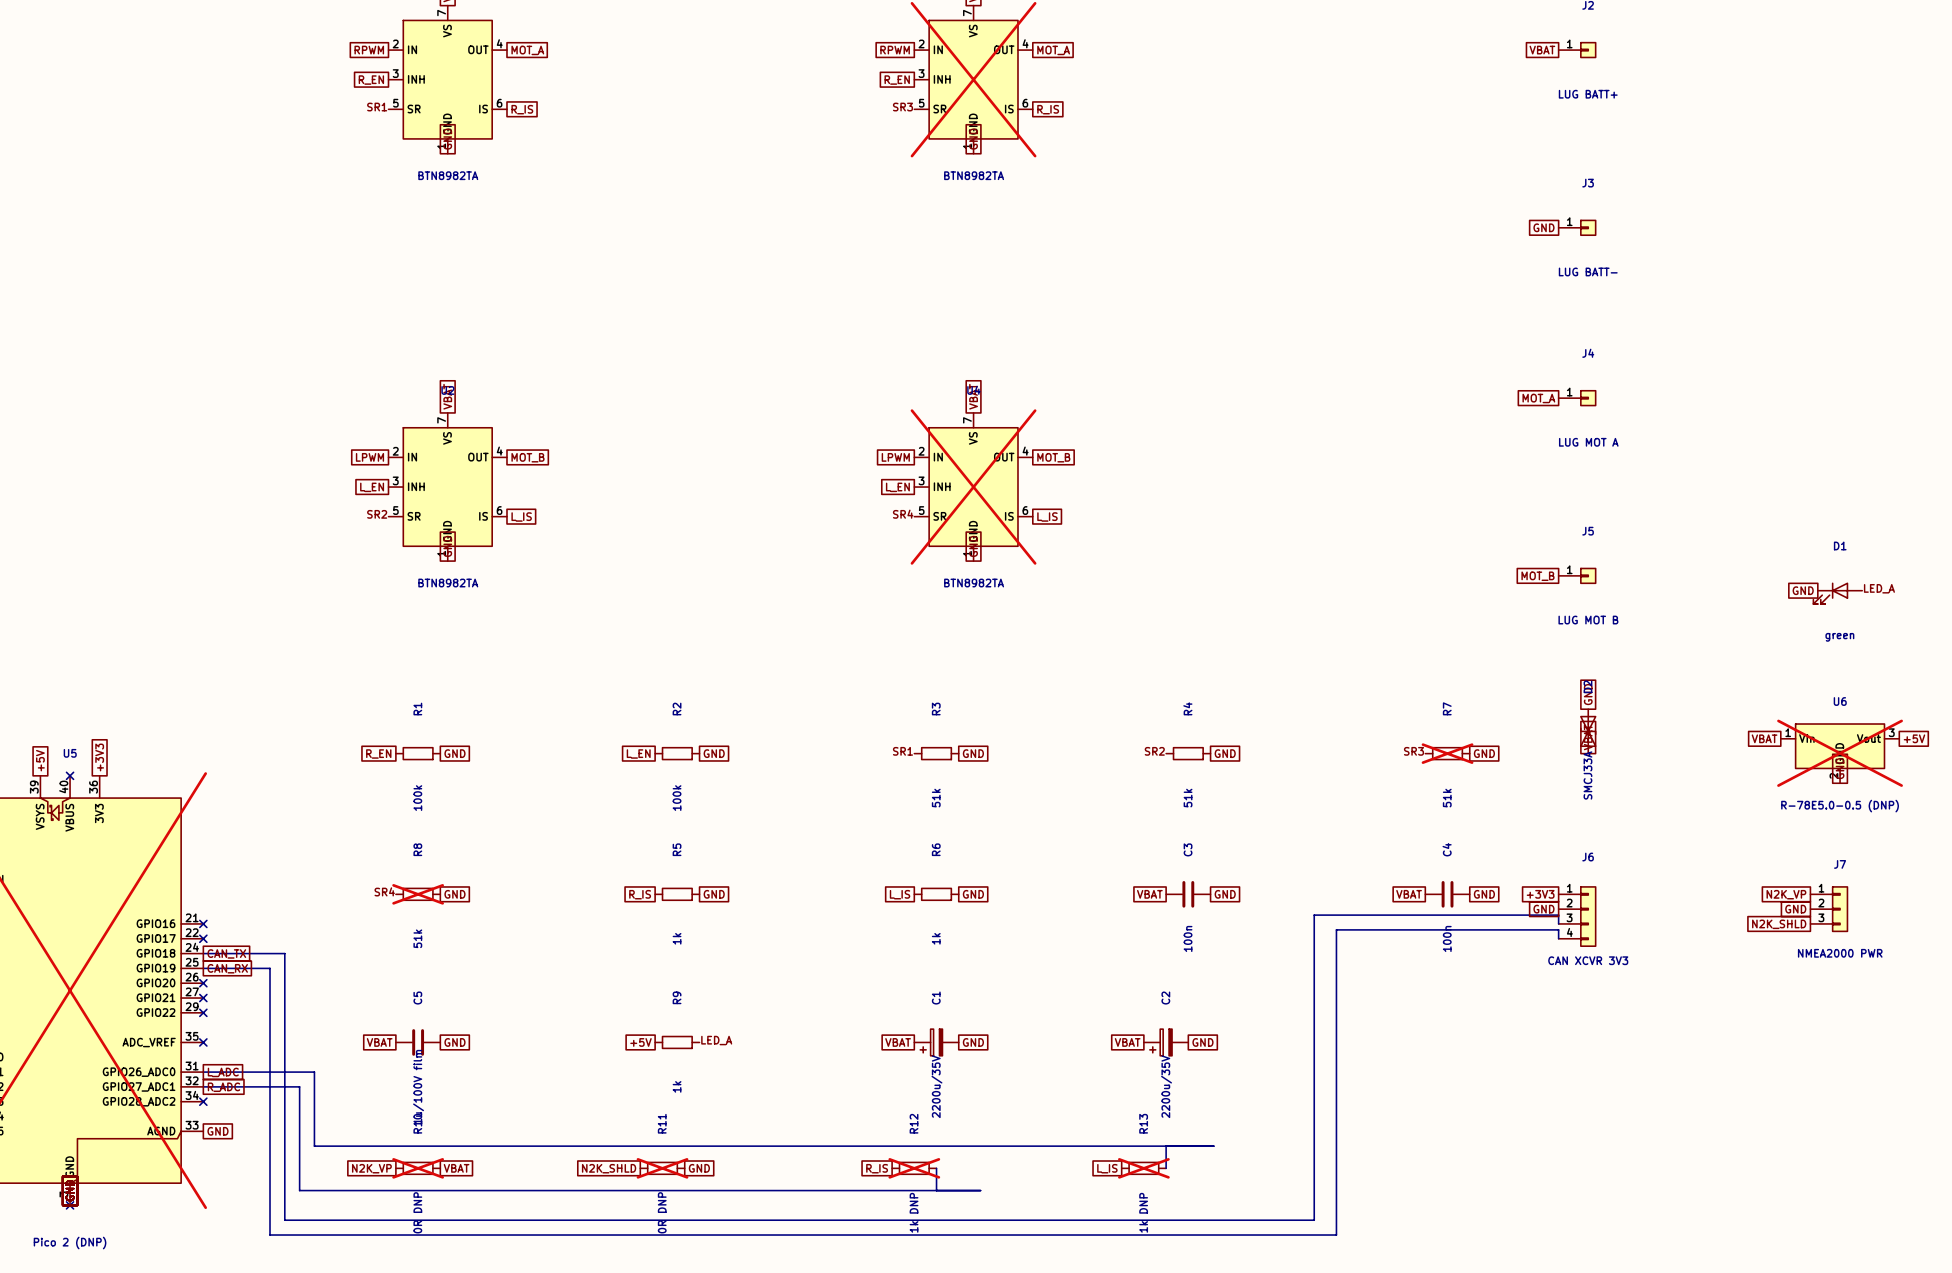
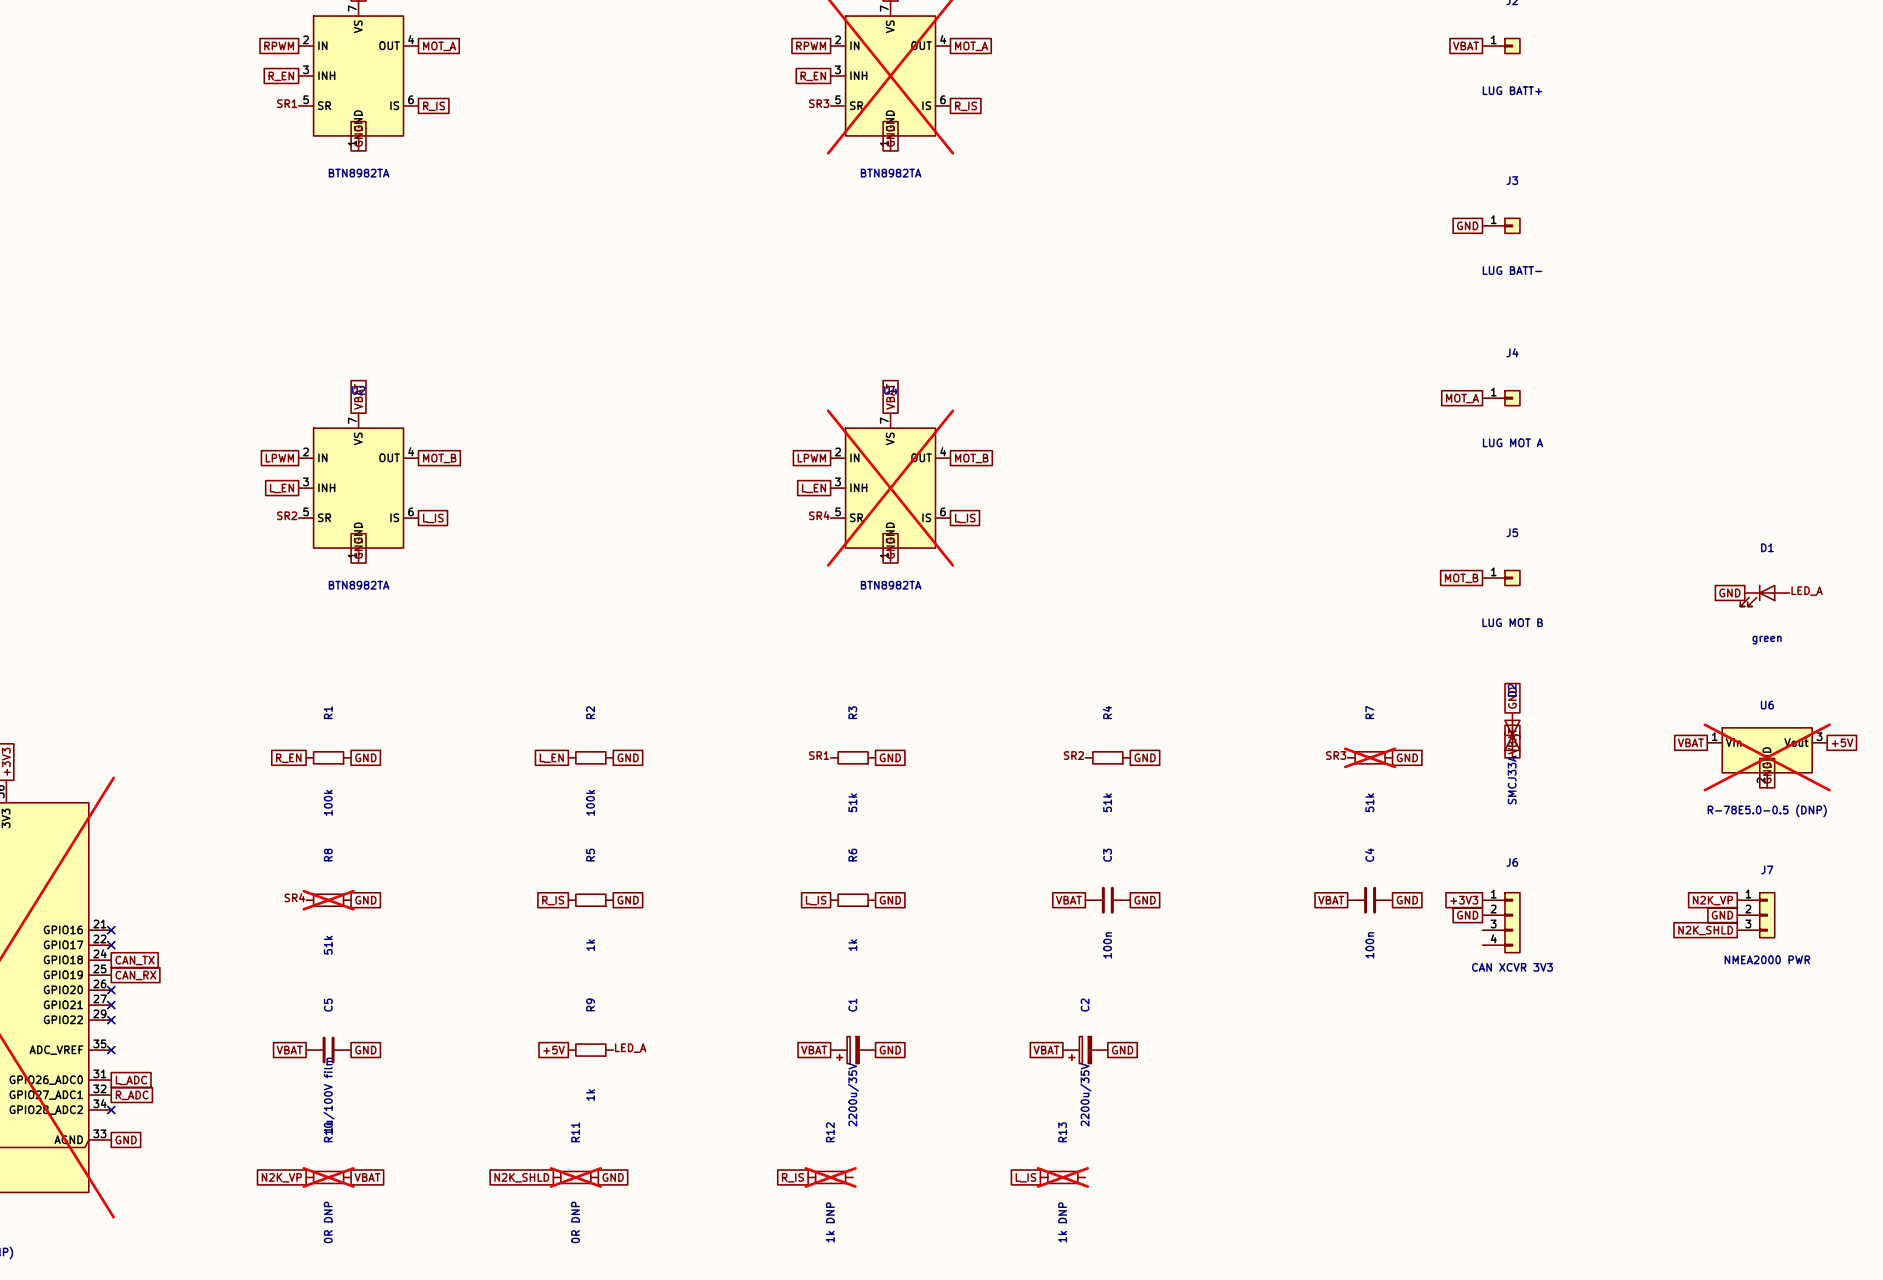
wire: (1558, 923) (1558, 915) (1314, 915) (1314, 1220) (284, 1220) (284, 953) (203, 953) -> none
wire: (1558, 938) (1558, 929) (1336, 929) (1336, 1235) (270, 1235) (270, 968) (203, 968) -> none
wire: (203, 1072) (314, 1072) (314, 1146) (1213, 1146) -> none
wire: (203, 1086) (299, 1086) (299, 1190) (980, 1190) -> none
wire: (1166, 1146) (1166, 1168) -> none
wire: (936, 1168) (936, 1190) -> none

